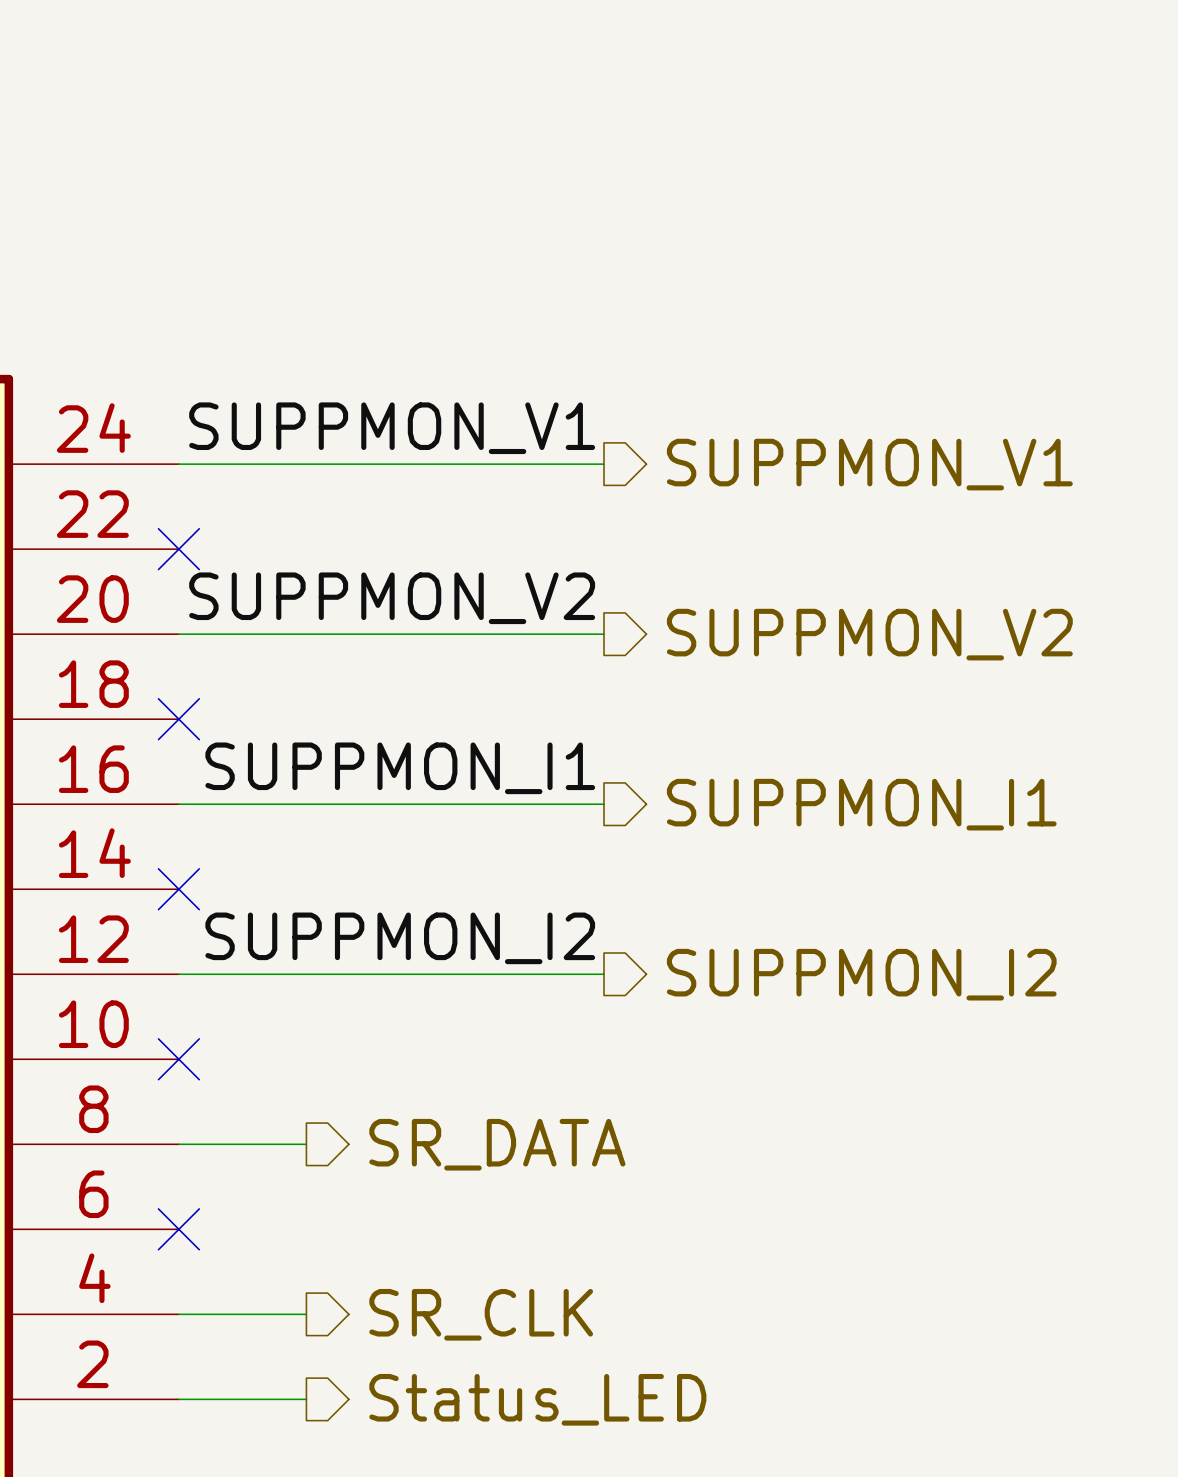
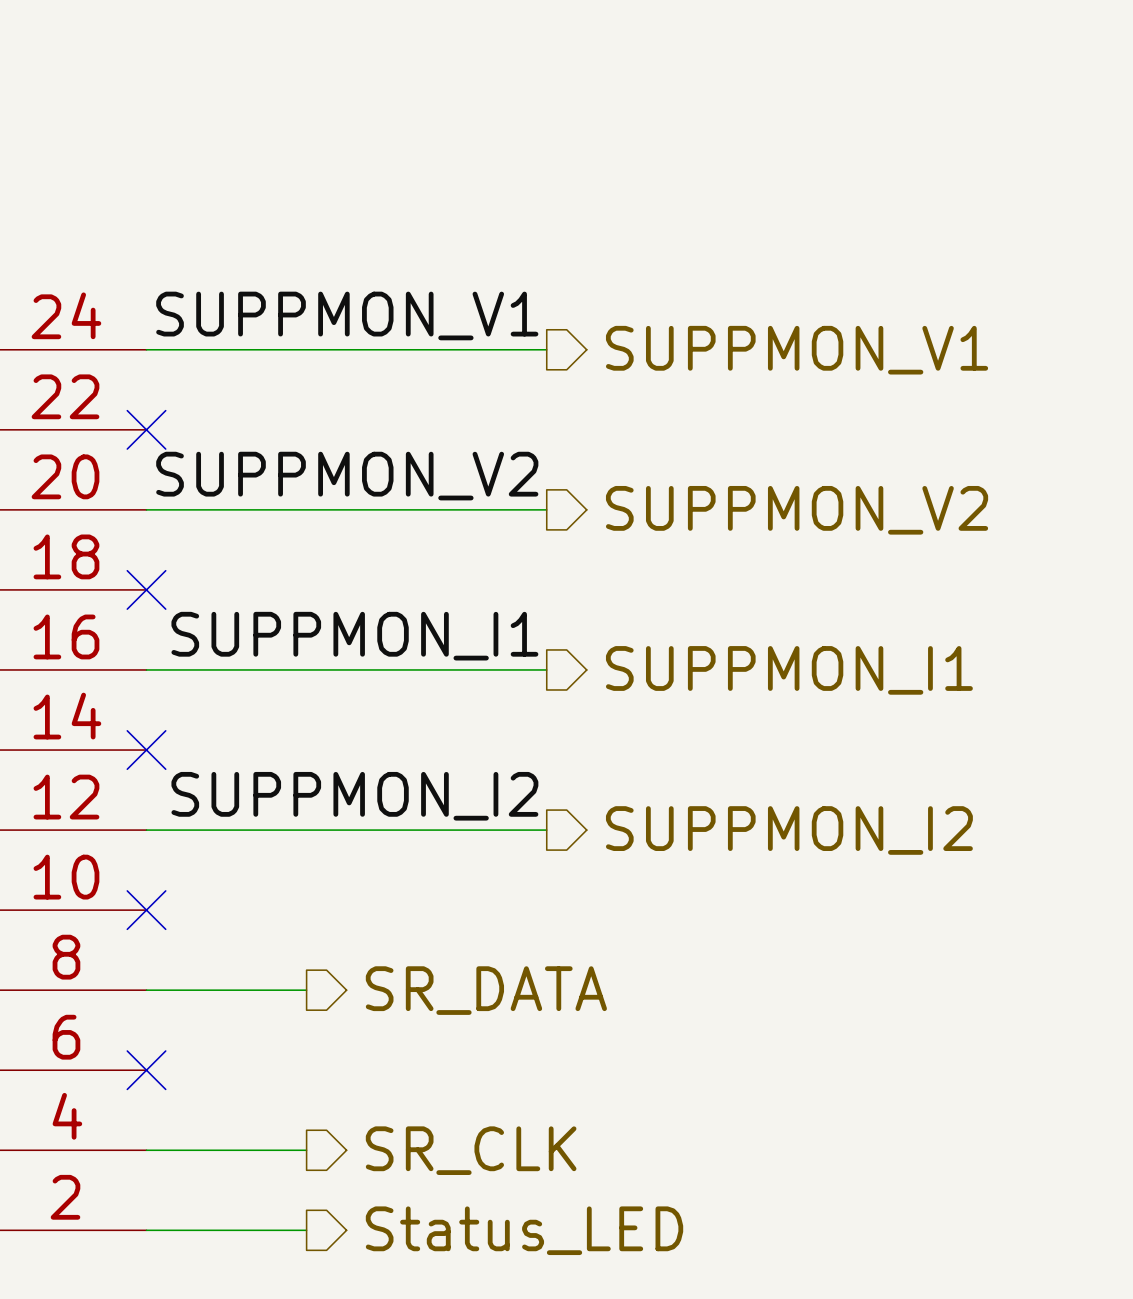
wire: none -> (266, 990) (306, 990)
hierarchical label position: SR_DATA (497, 1144) -> SR_DATA (486, 990)
wire: none -> (266, 1150) (306, 1150)
hierarchical label position: SR_CLK (481, 1314) -> SR_CLK (471, 1150)
wire: none -> (266, 1230) (306, 1230)
hierarchical label position: Status_LED (537, 1399) -> Status_LED (524, 1230)

